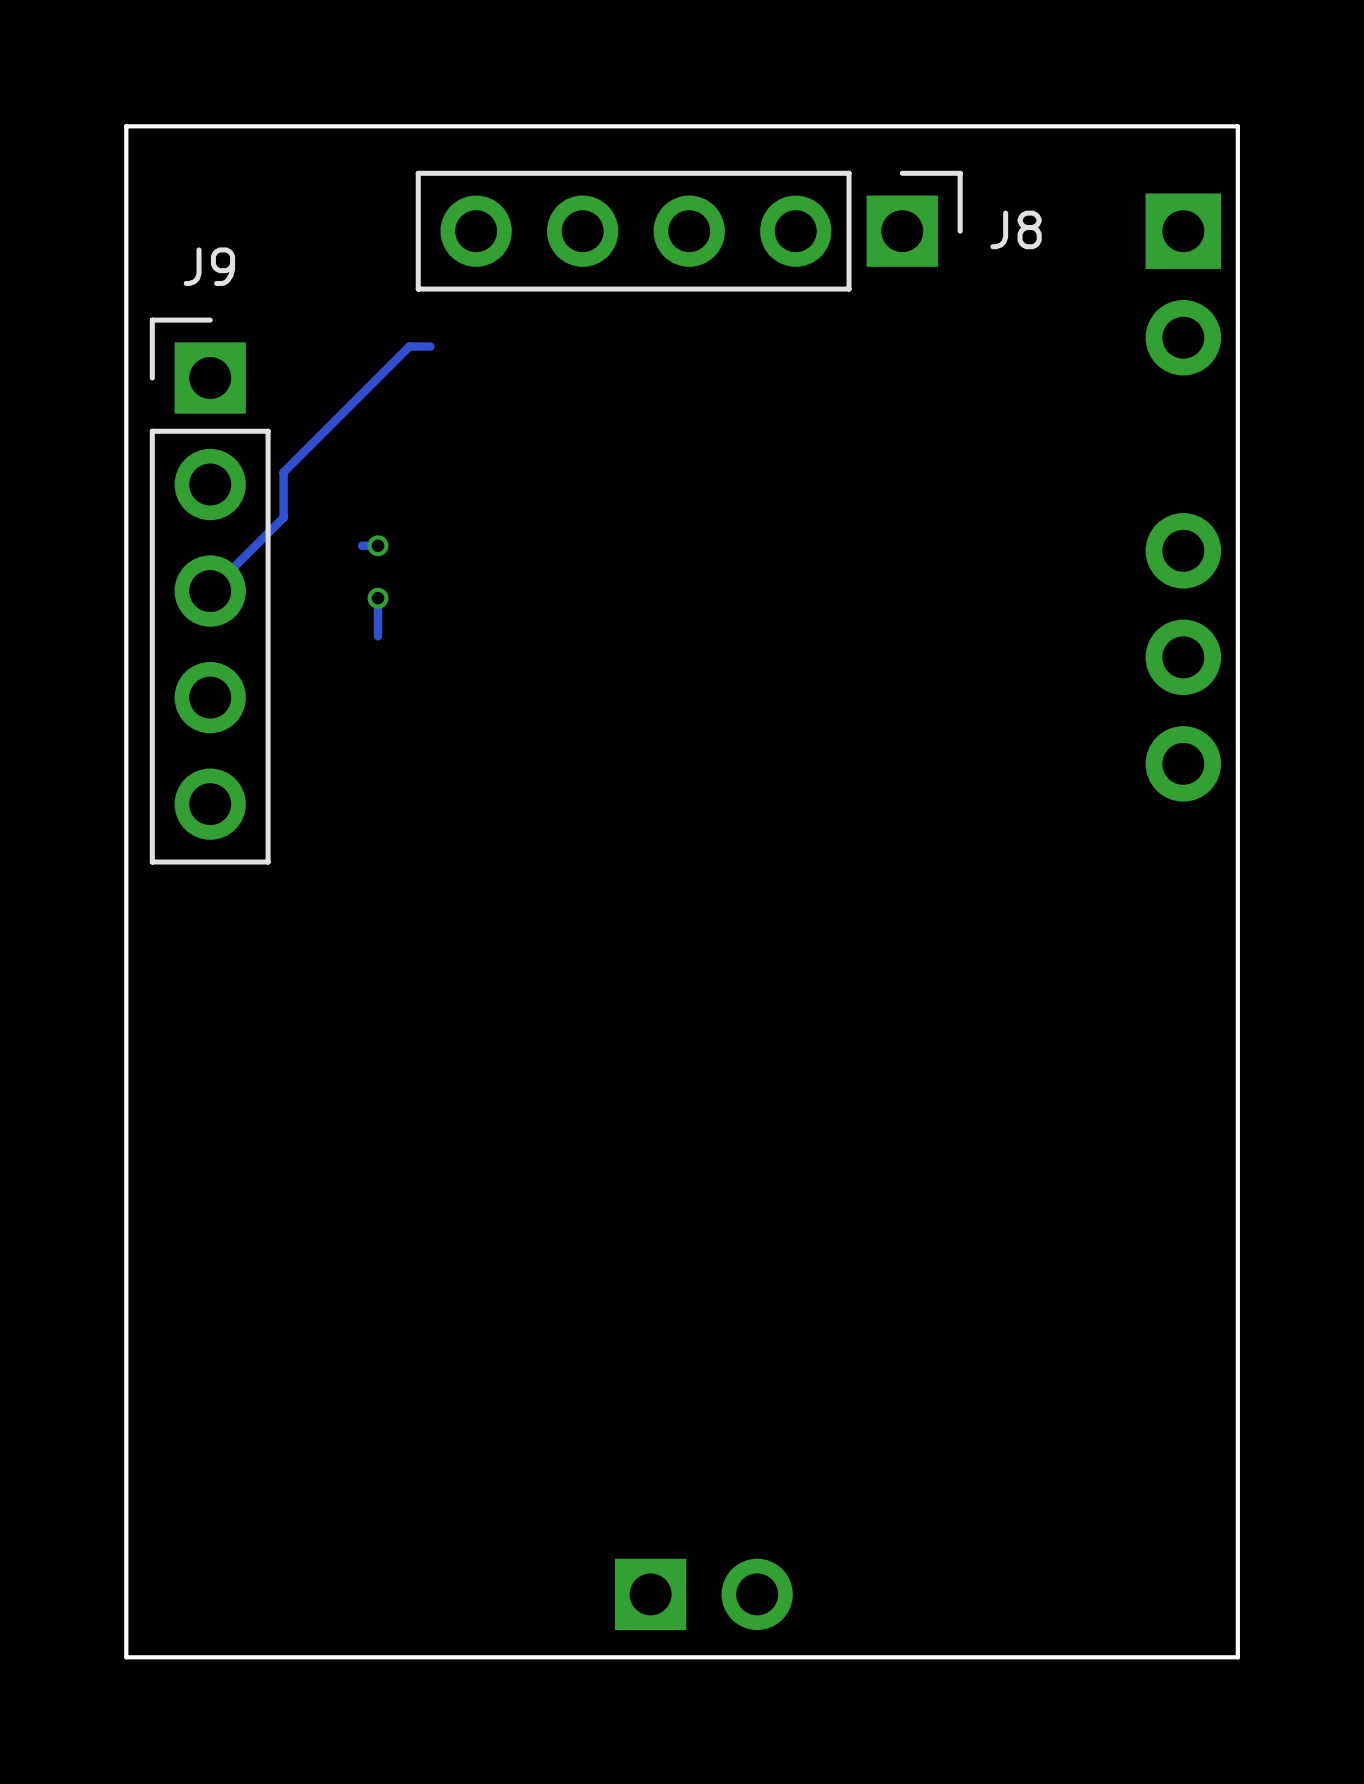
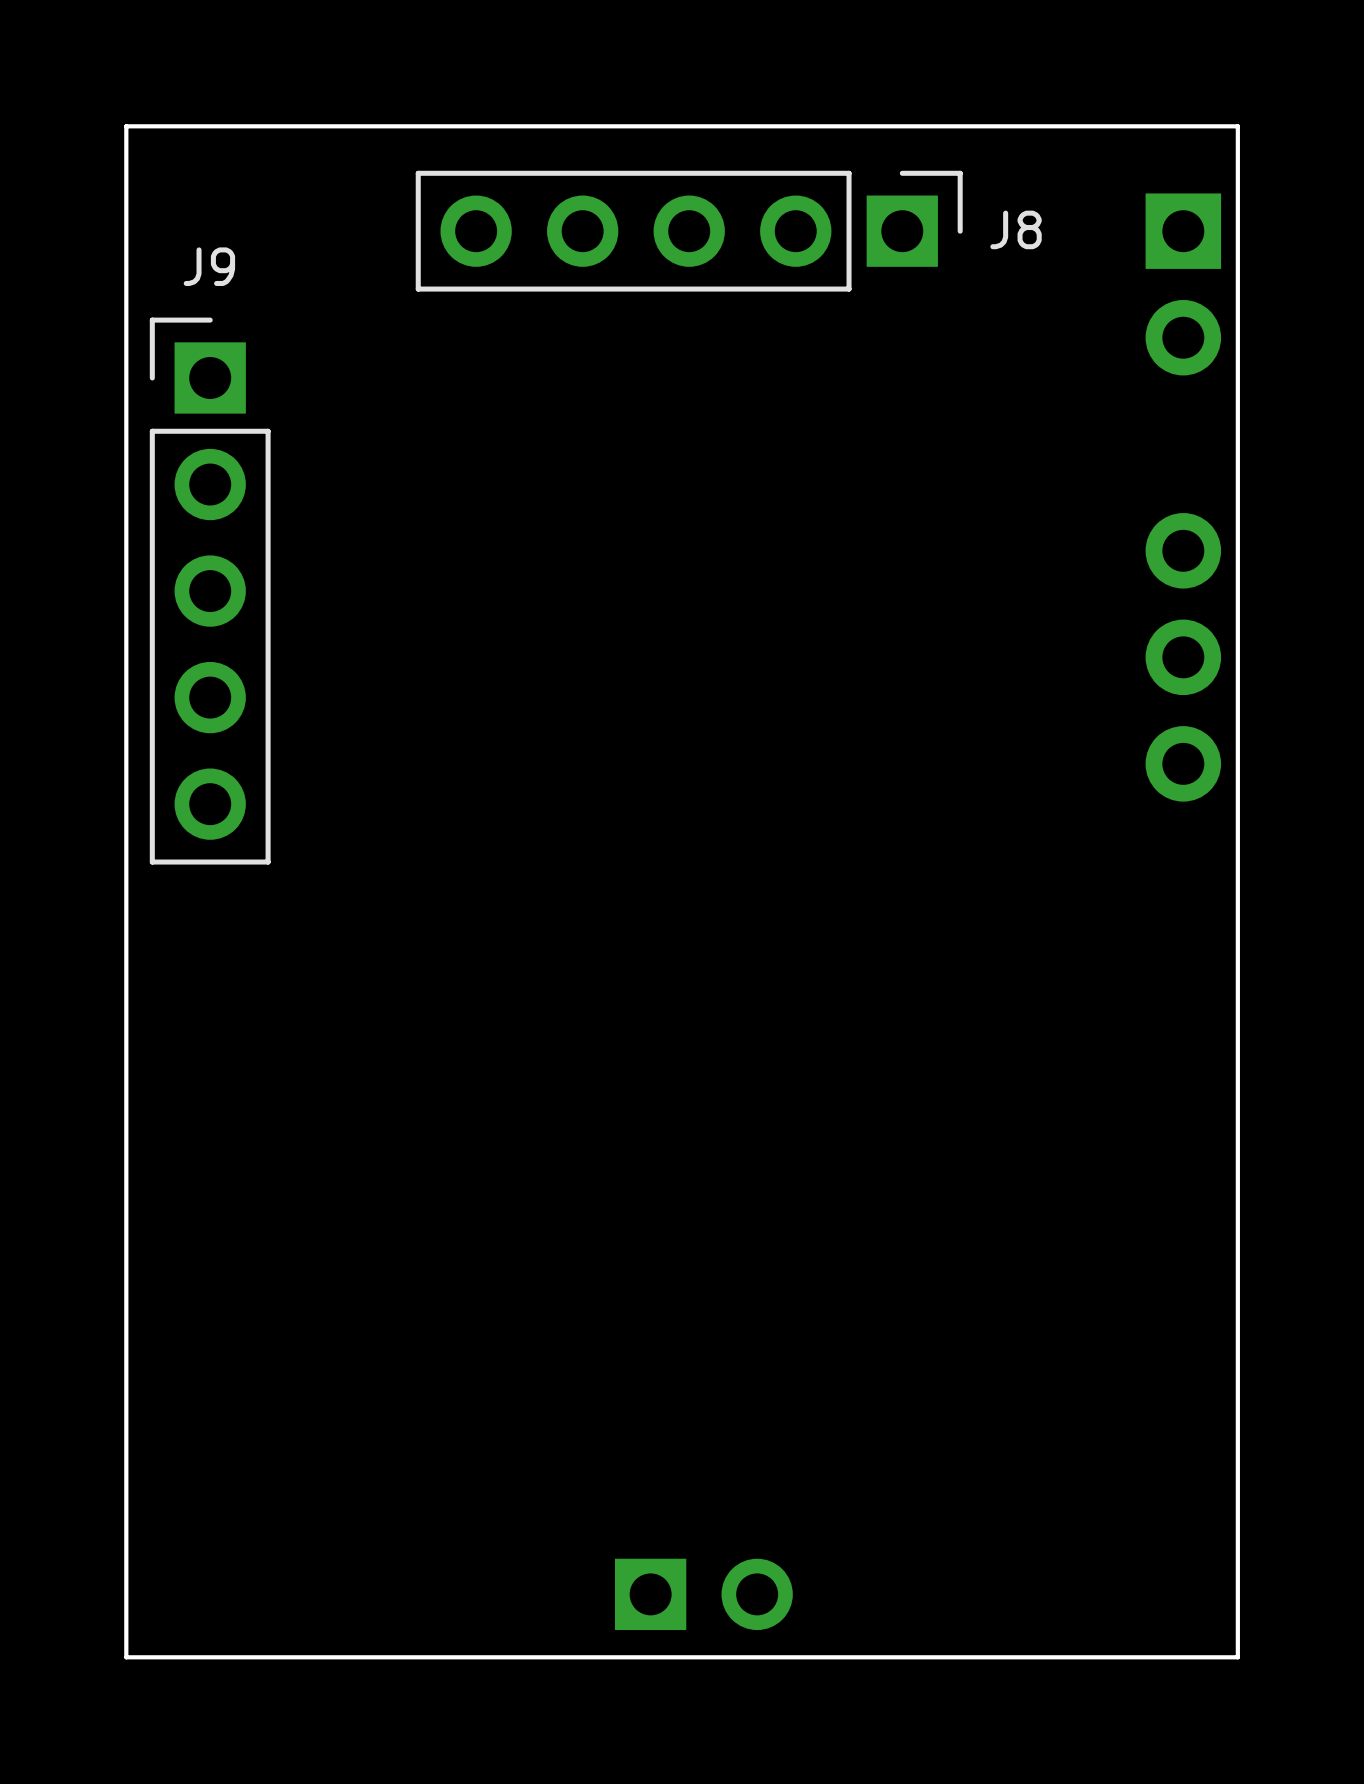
track: (430, 346) (409, 346) (283, 472) (283, 517) (210, 591) -> none
track: (377, 545) (362, 545) -> none
via: (377, 545) -> none
track: (377, 598) (377, 636) -> none
via: (377, 598) -> none

